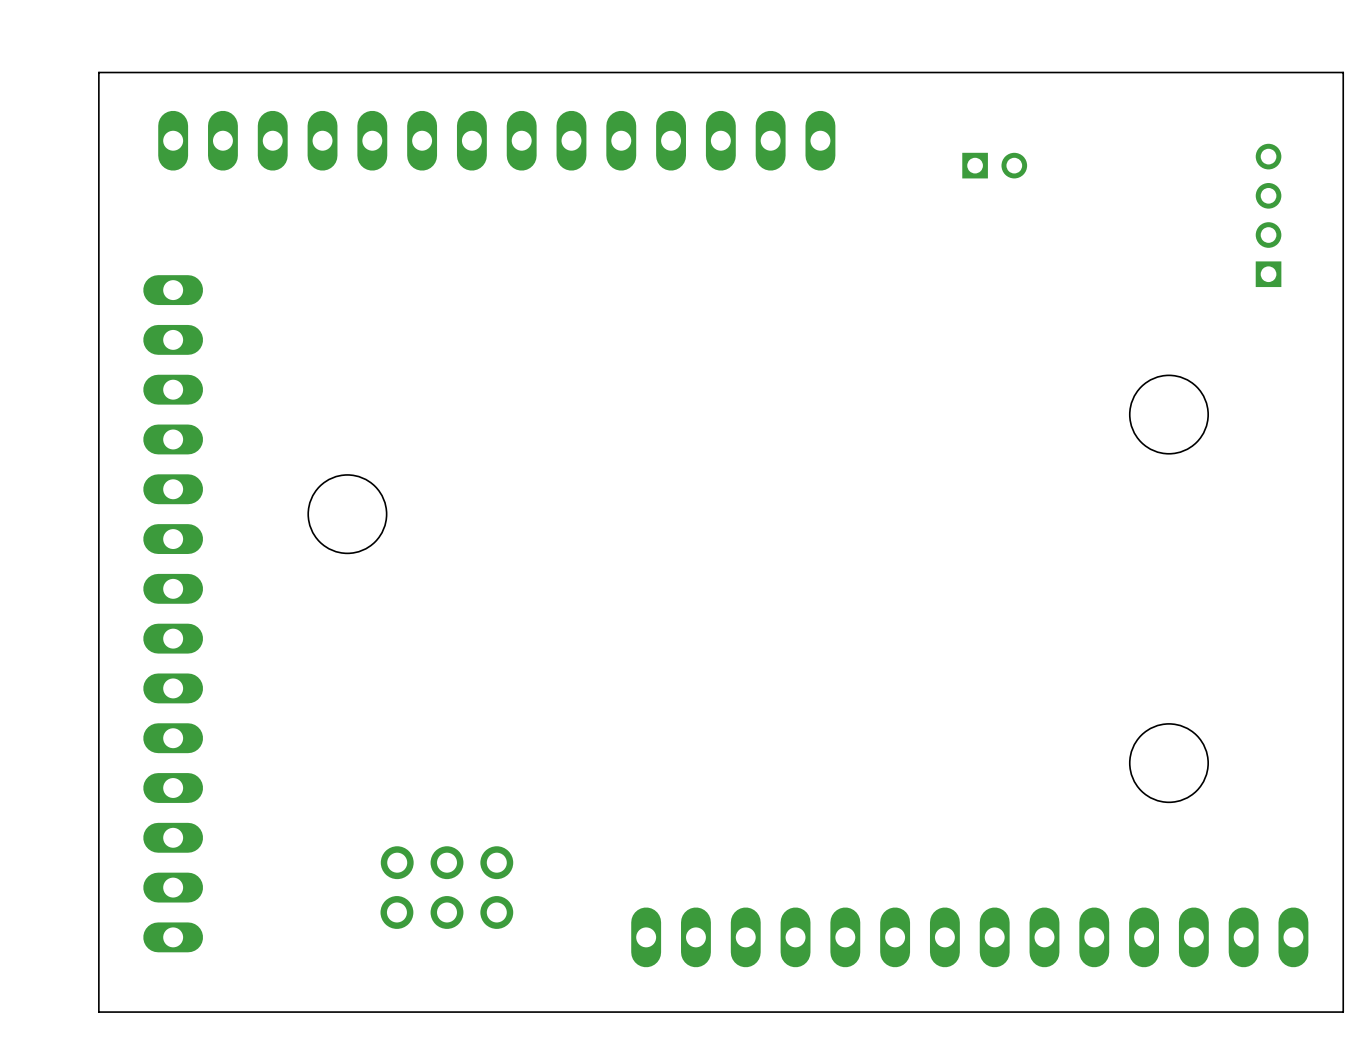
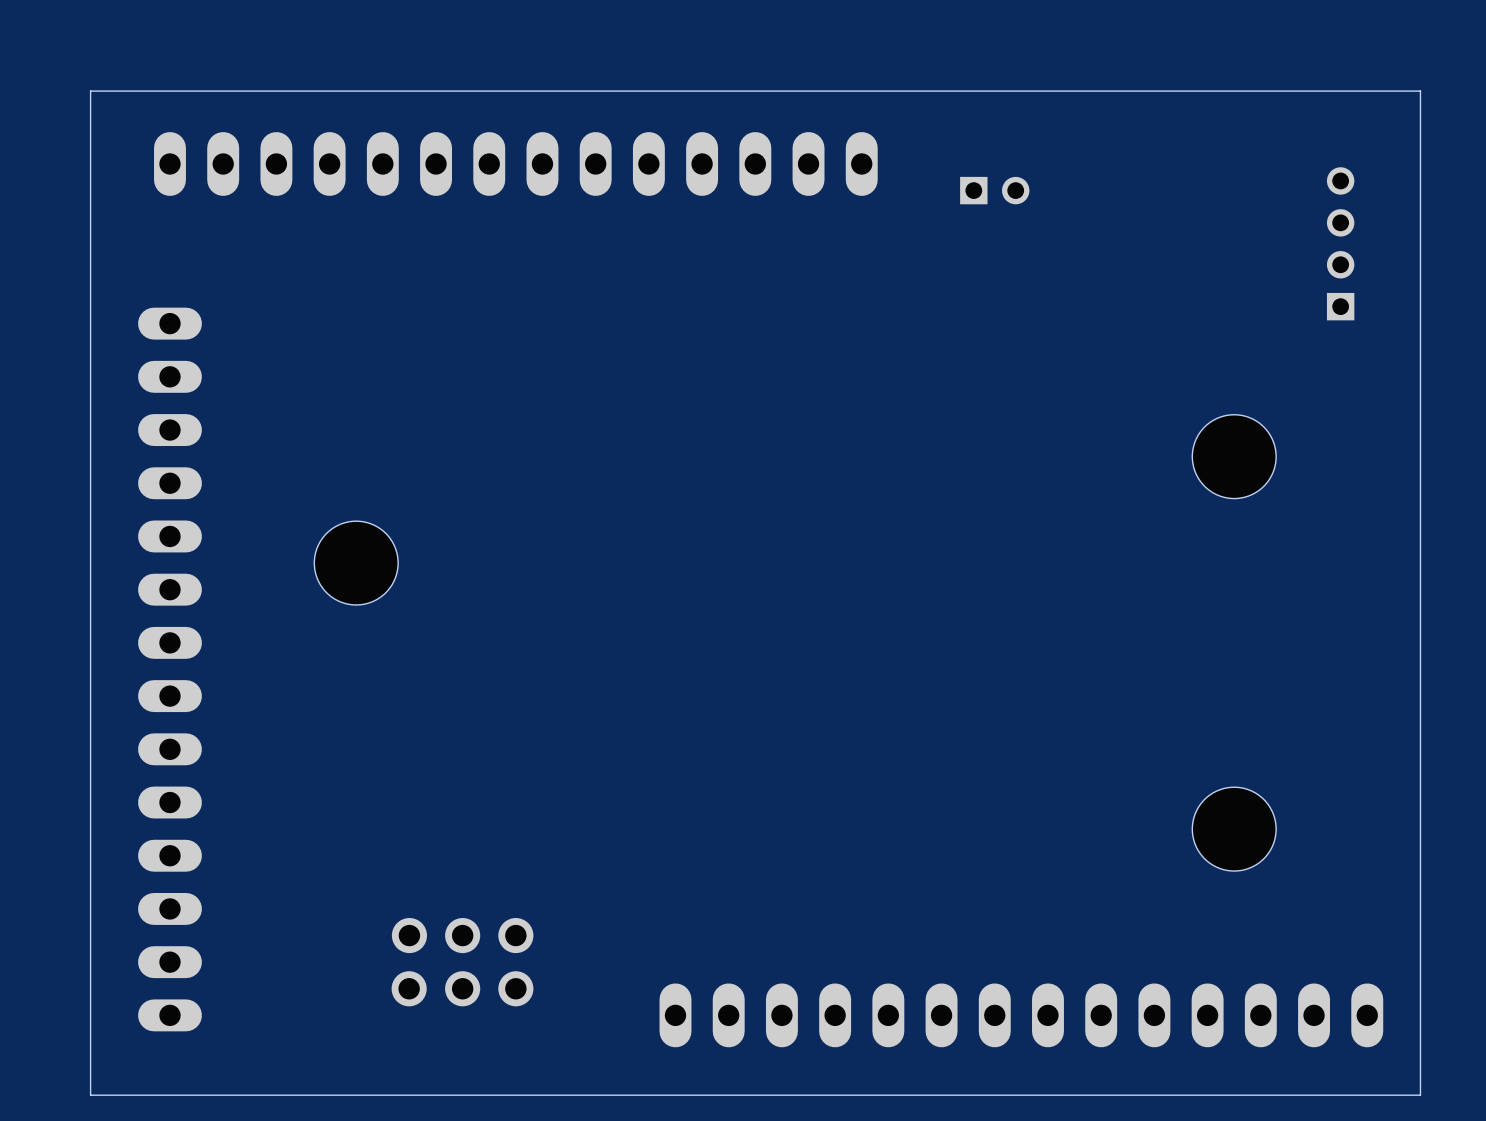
part position: (994, 165) -> (994, 190)

